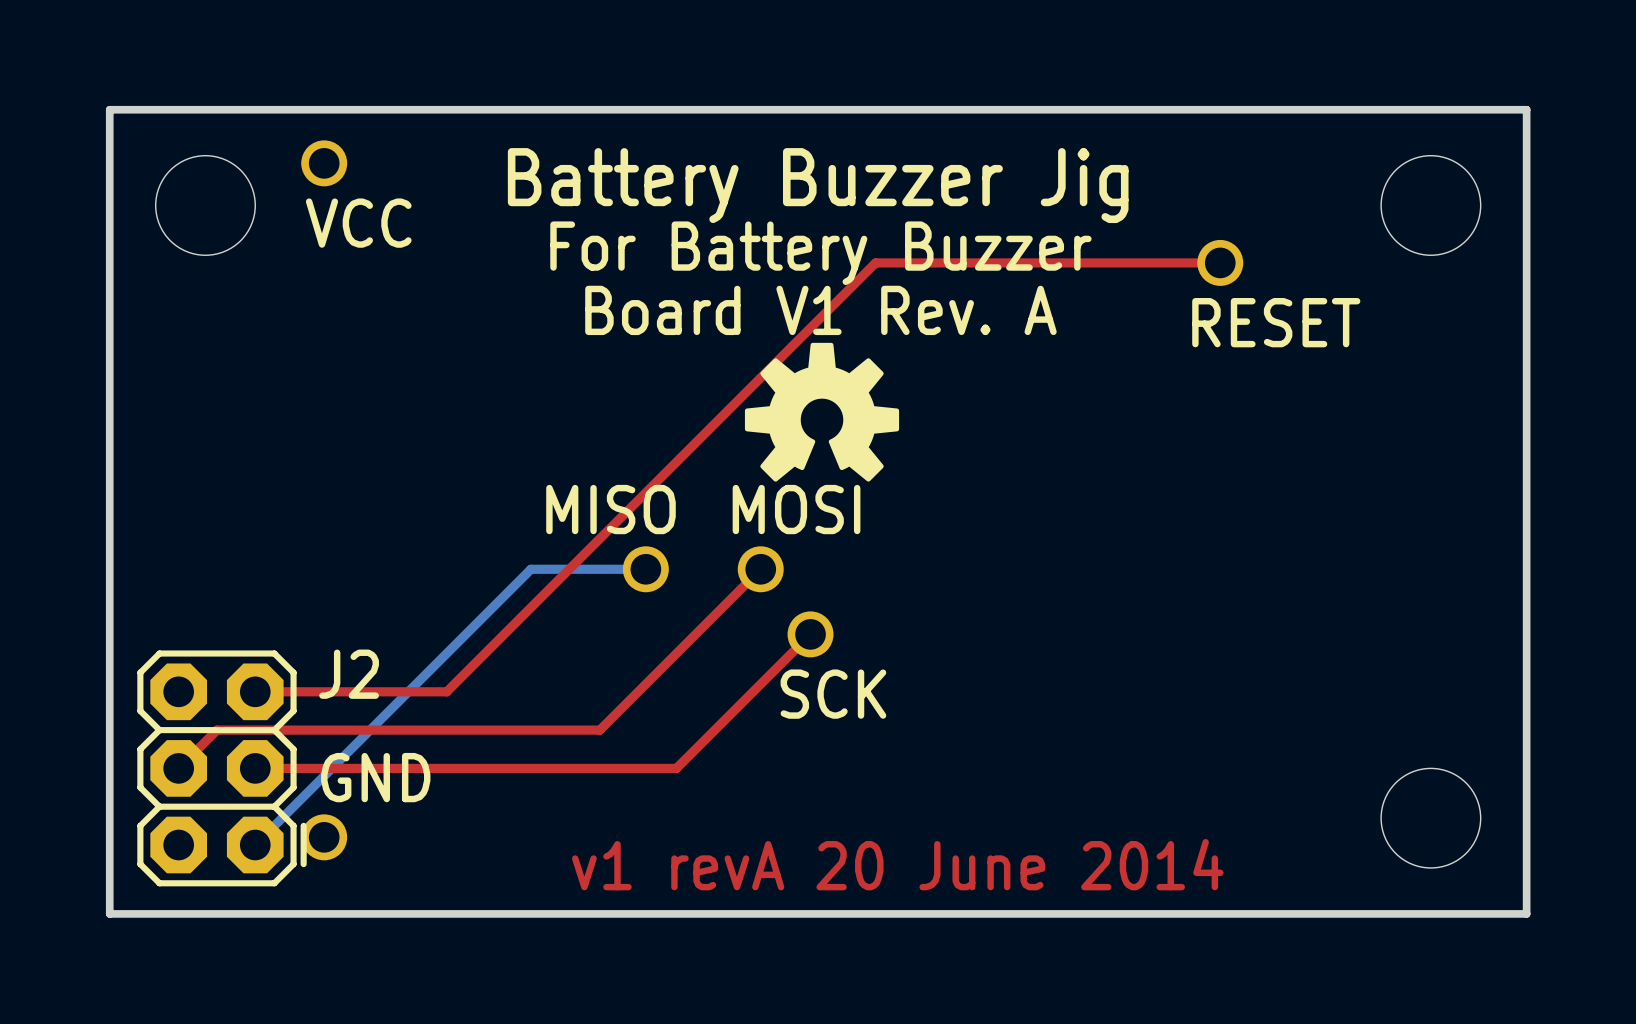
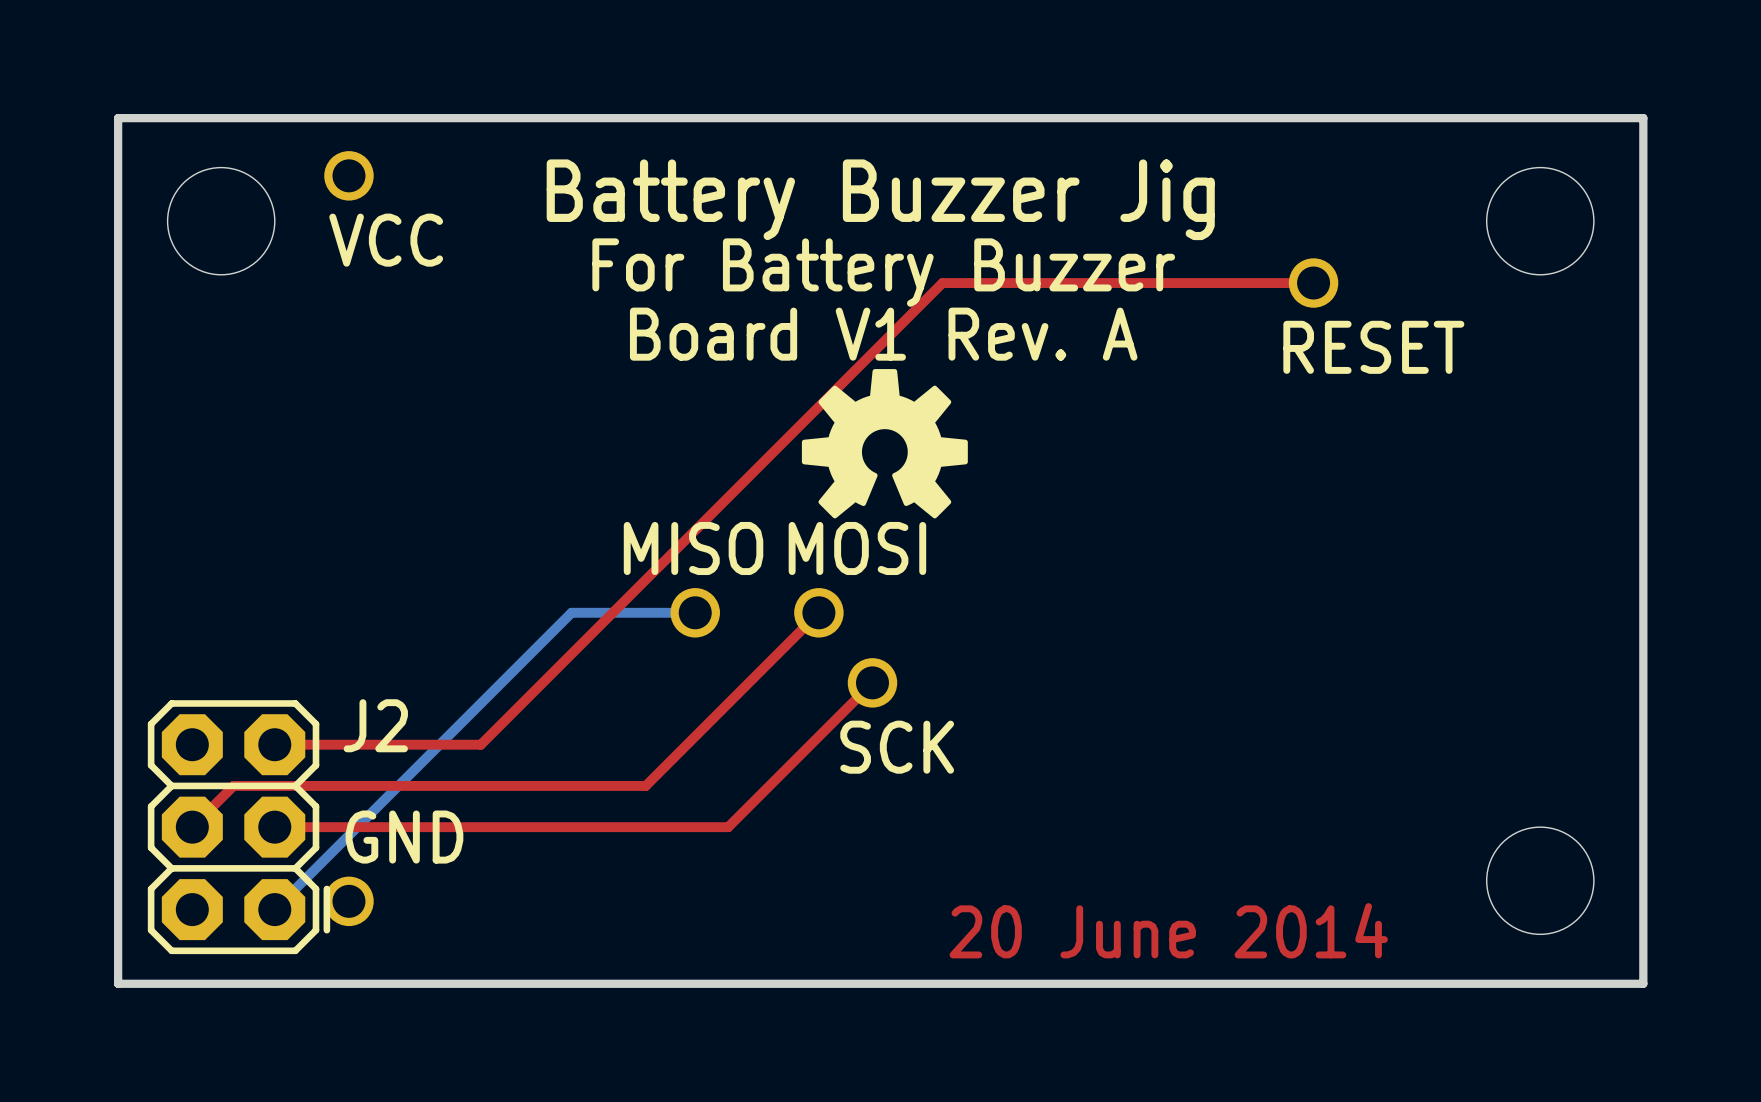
MISO name position: MISO (610, 509) -> MISO (693, 548)
text: v1 revA 20 June 2014 (897, 864) -> 20 June 2014 (1168, 930)

